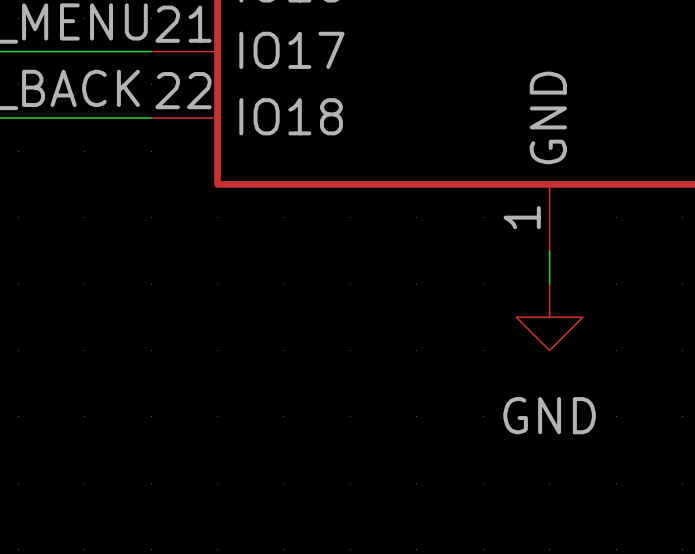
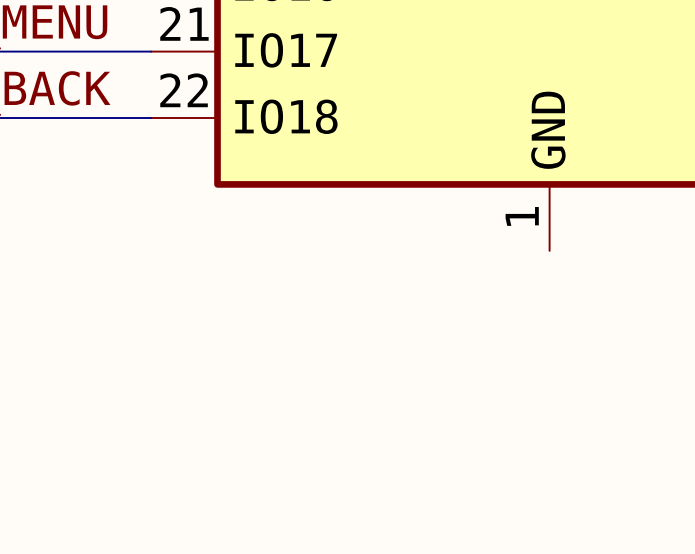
wire: (549, 250) (549, 284) -> none
power symbol: GND (549, 317) -> none

